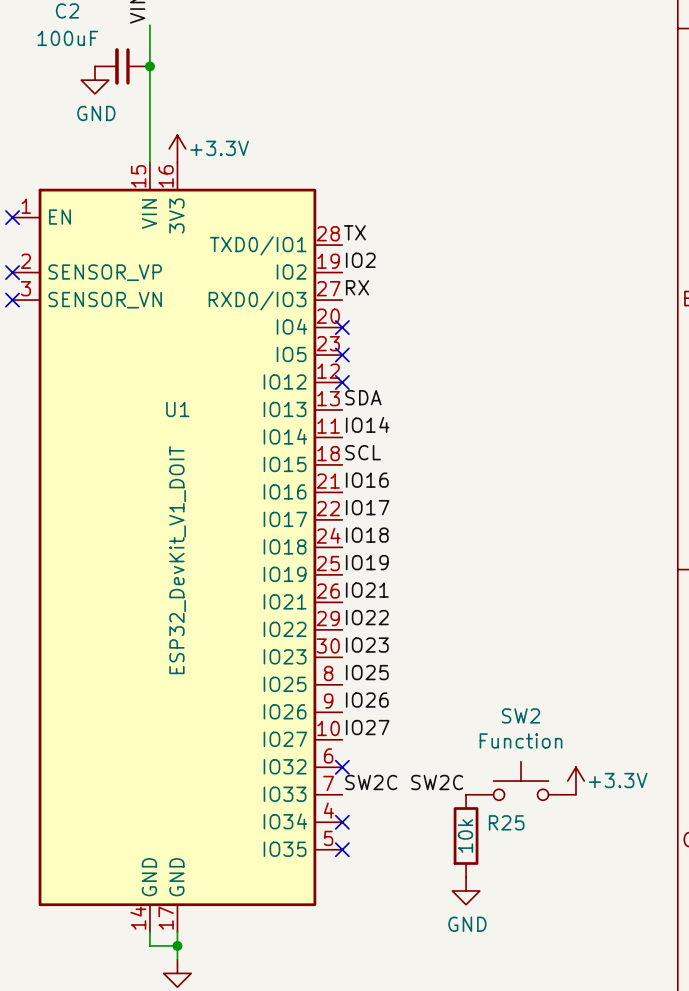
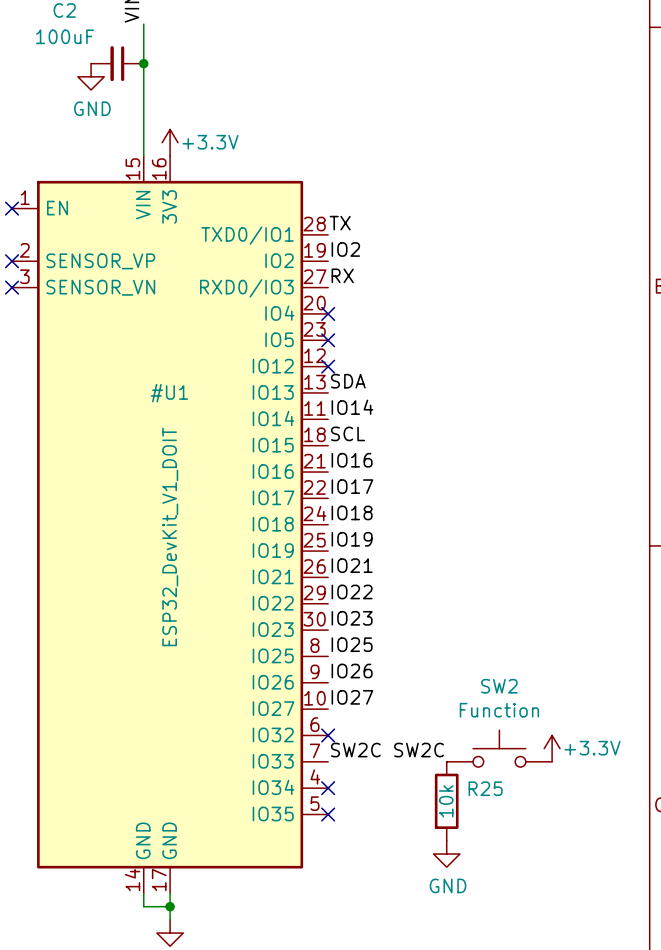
U1: ESP32_DevKit_V1_DOIT (177, 547) -> none
#U1: none -> ESP32_DevKit_V1_DOIT (170, 524)

